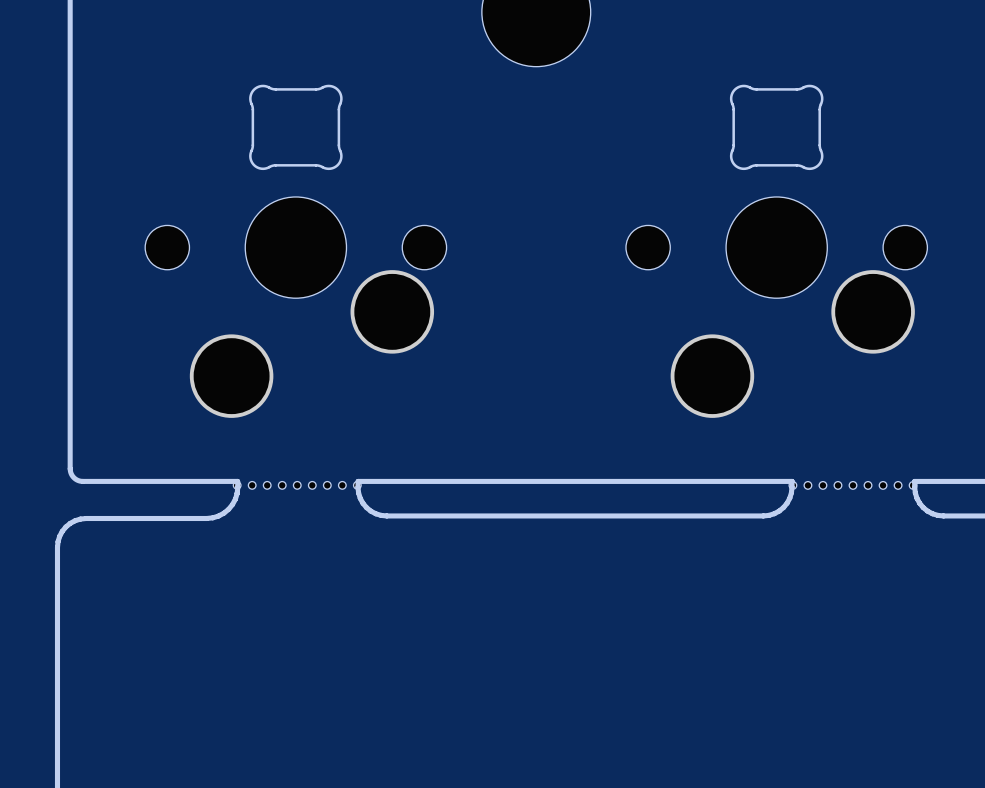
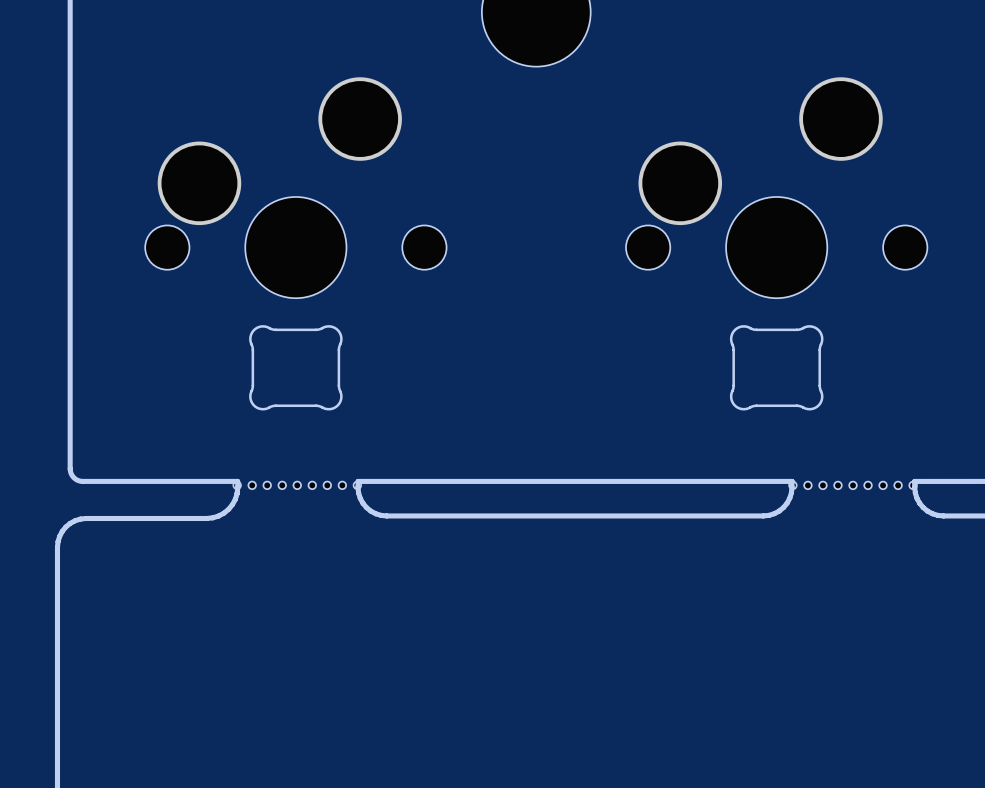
part position: (295, 127) -> (295, 367)
part position: (776, 127) -> (776, 367)
part rotation: 0° (295, 307) -> 180° (295, 187)
part rotation: 0° (776, 307) -> 180° (776, 187)

